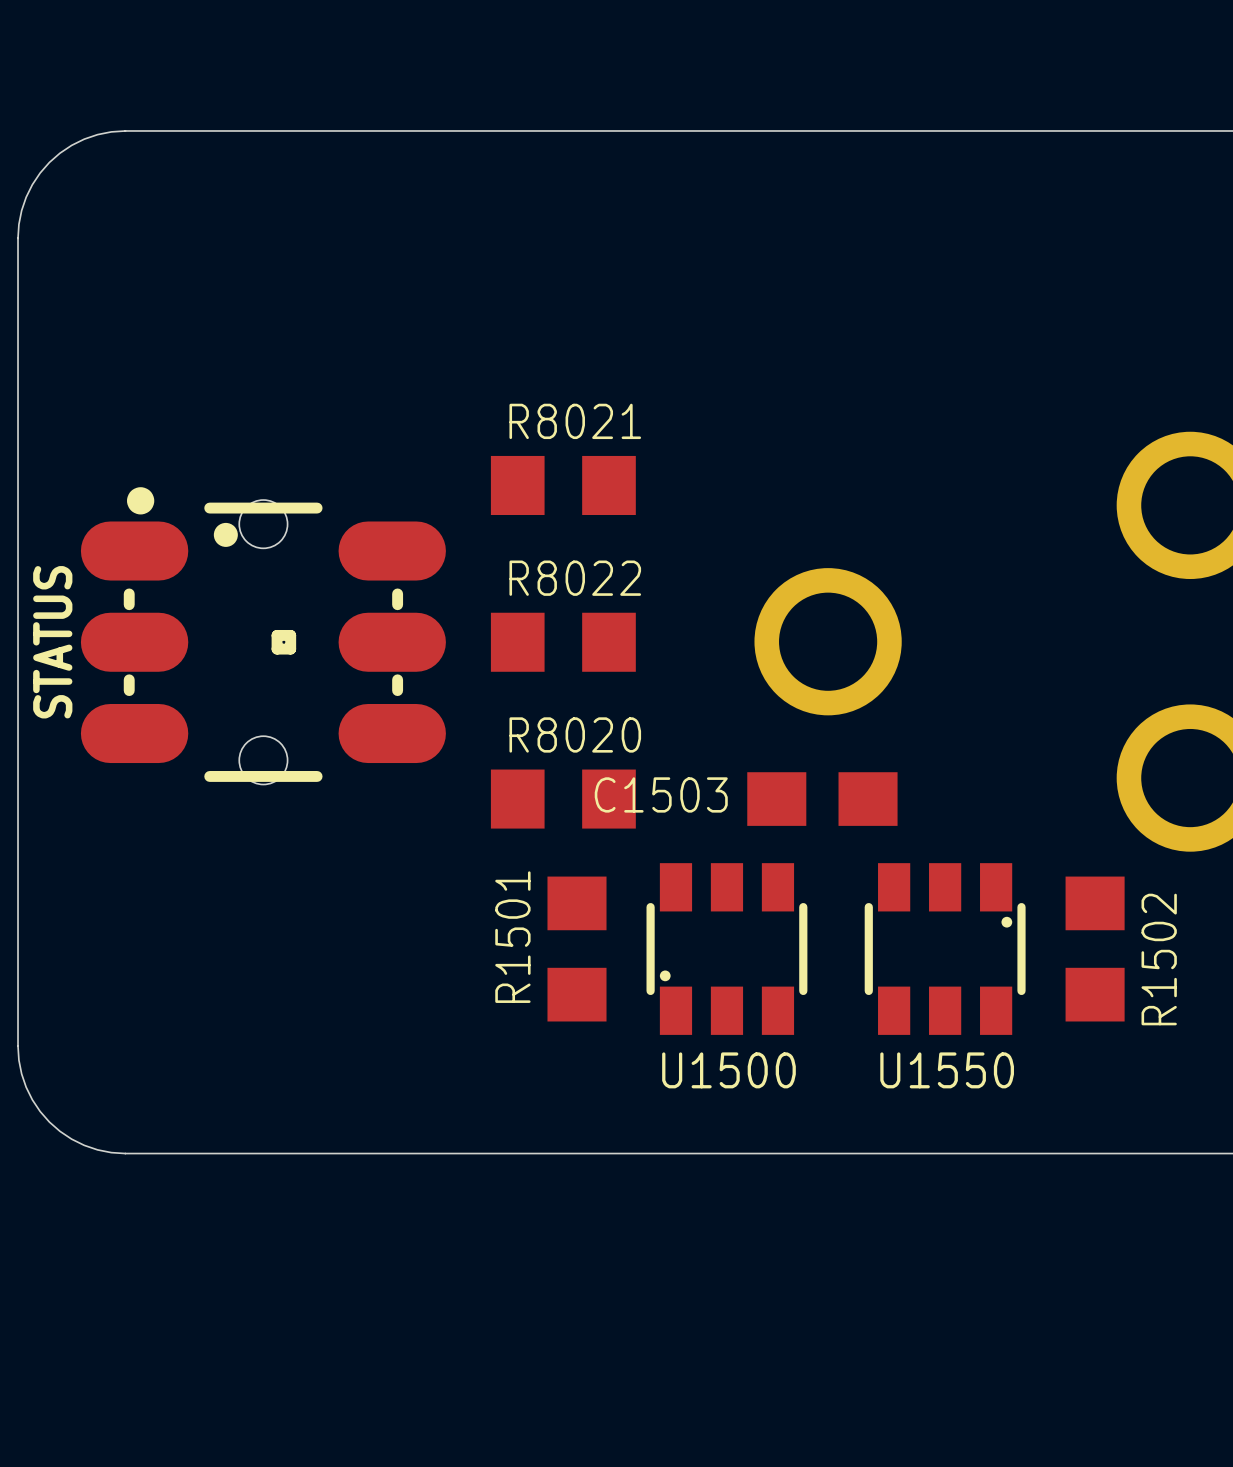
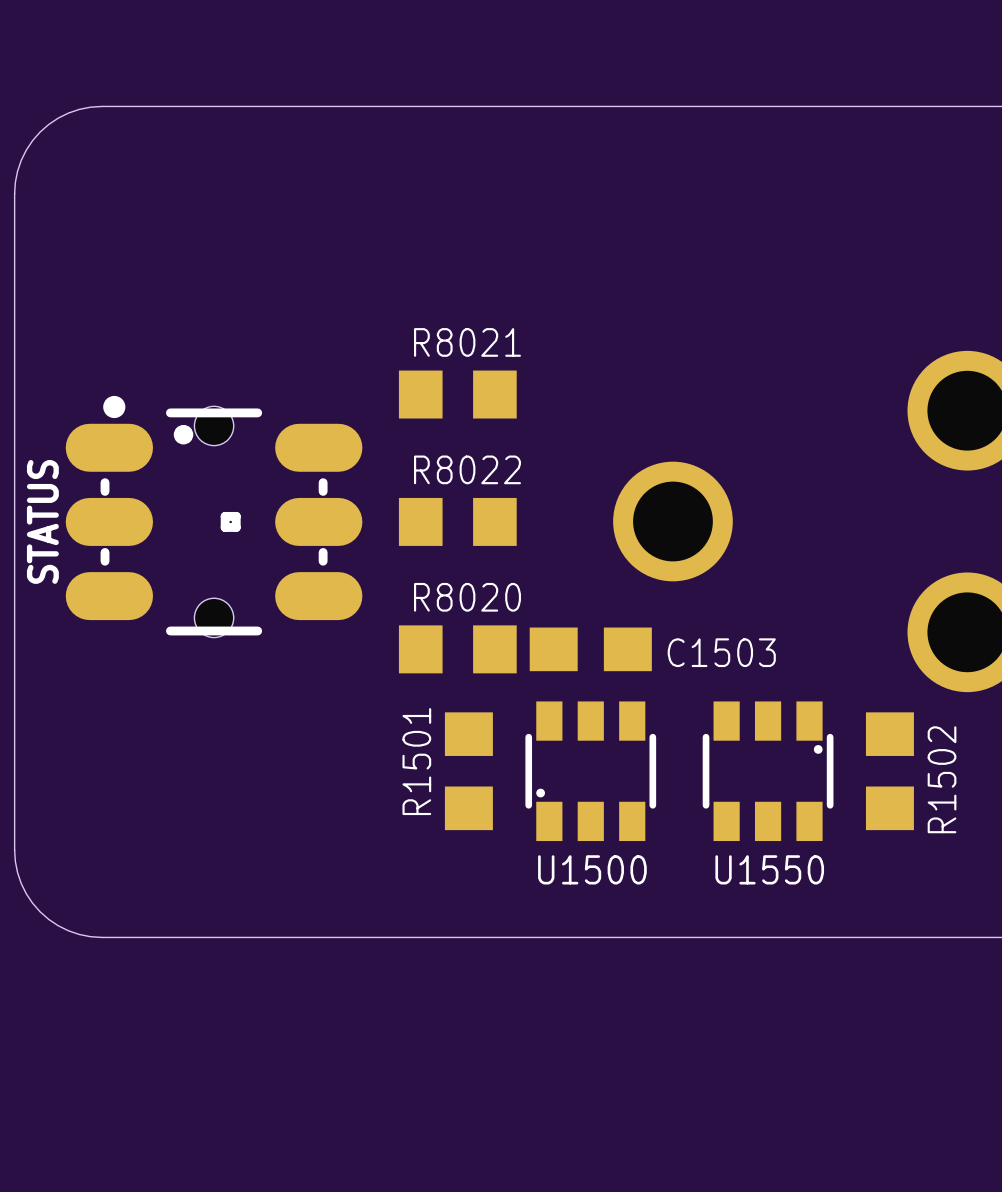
C1503 name position: C1503 (661, 794) -> C1503 (721, 652)
C1503 position: (822, 799) -> (590, 649)

